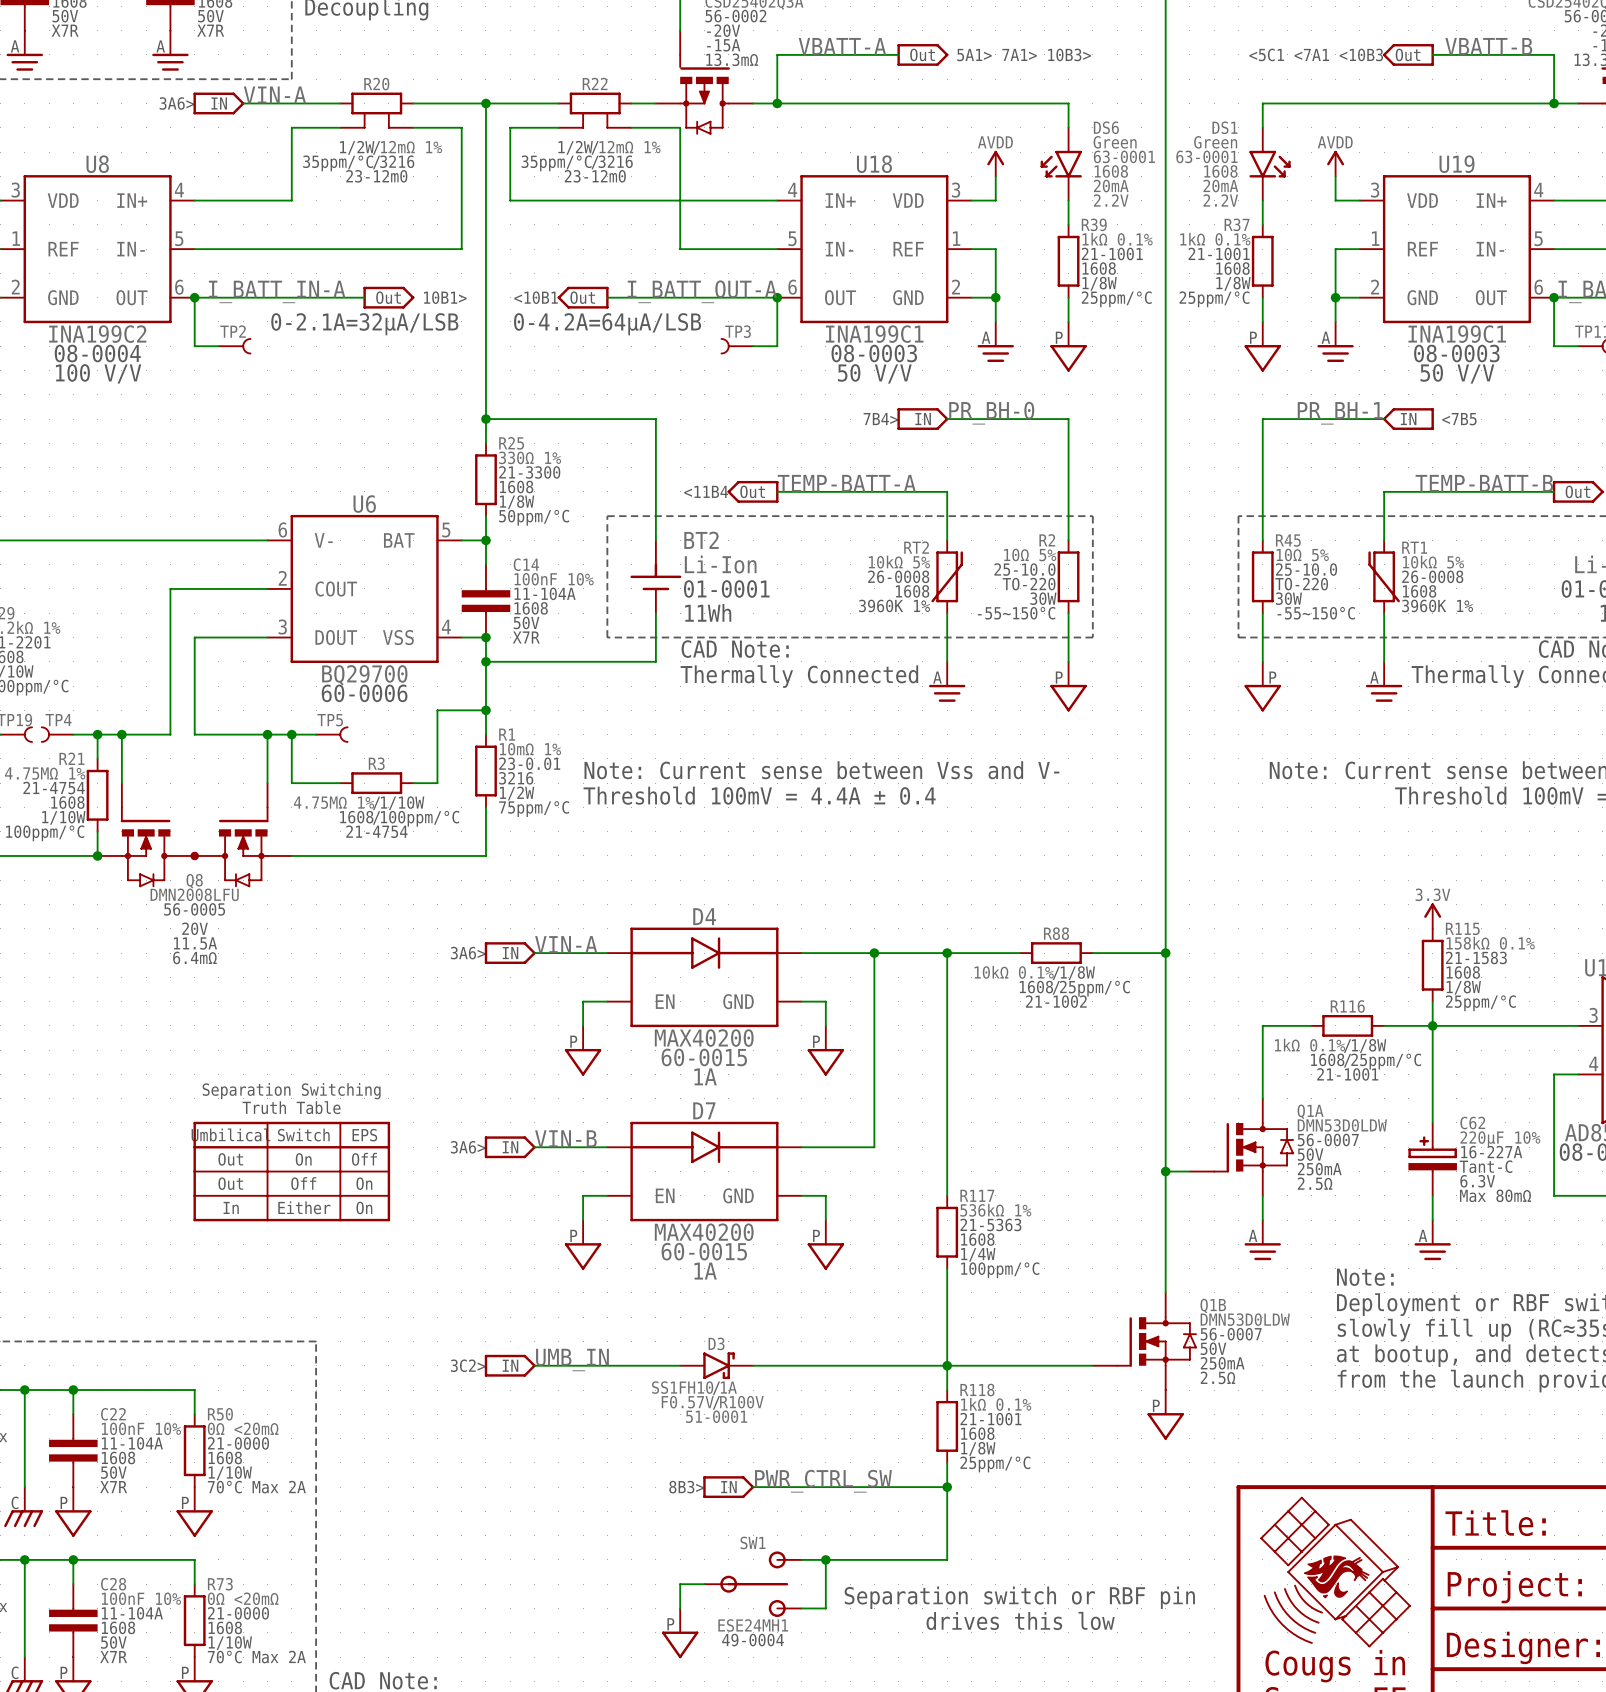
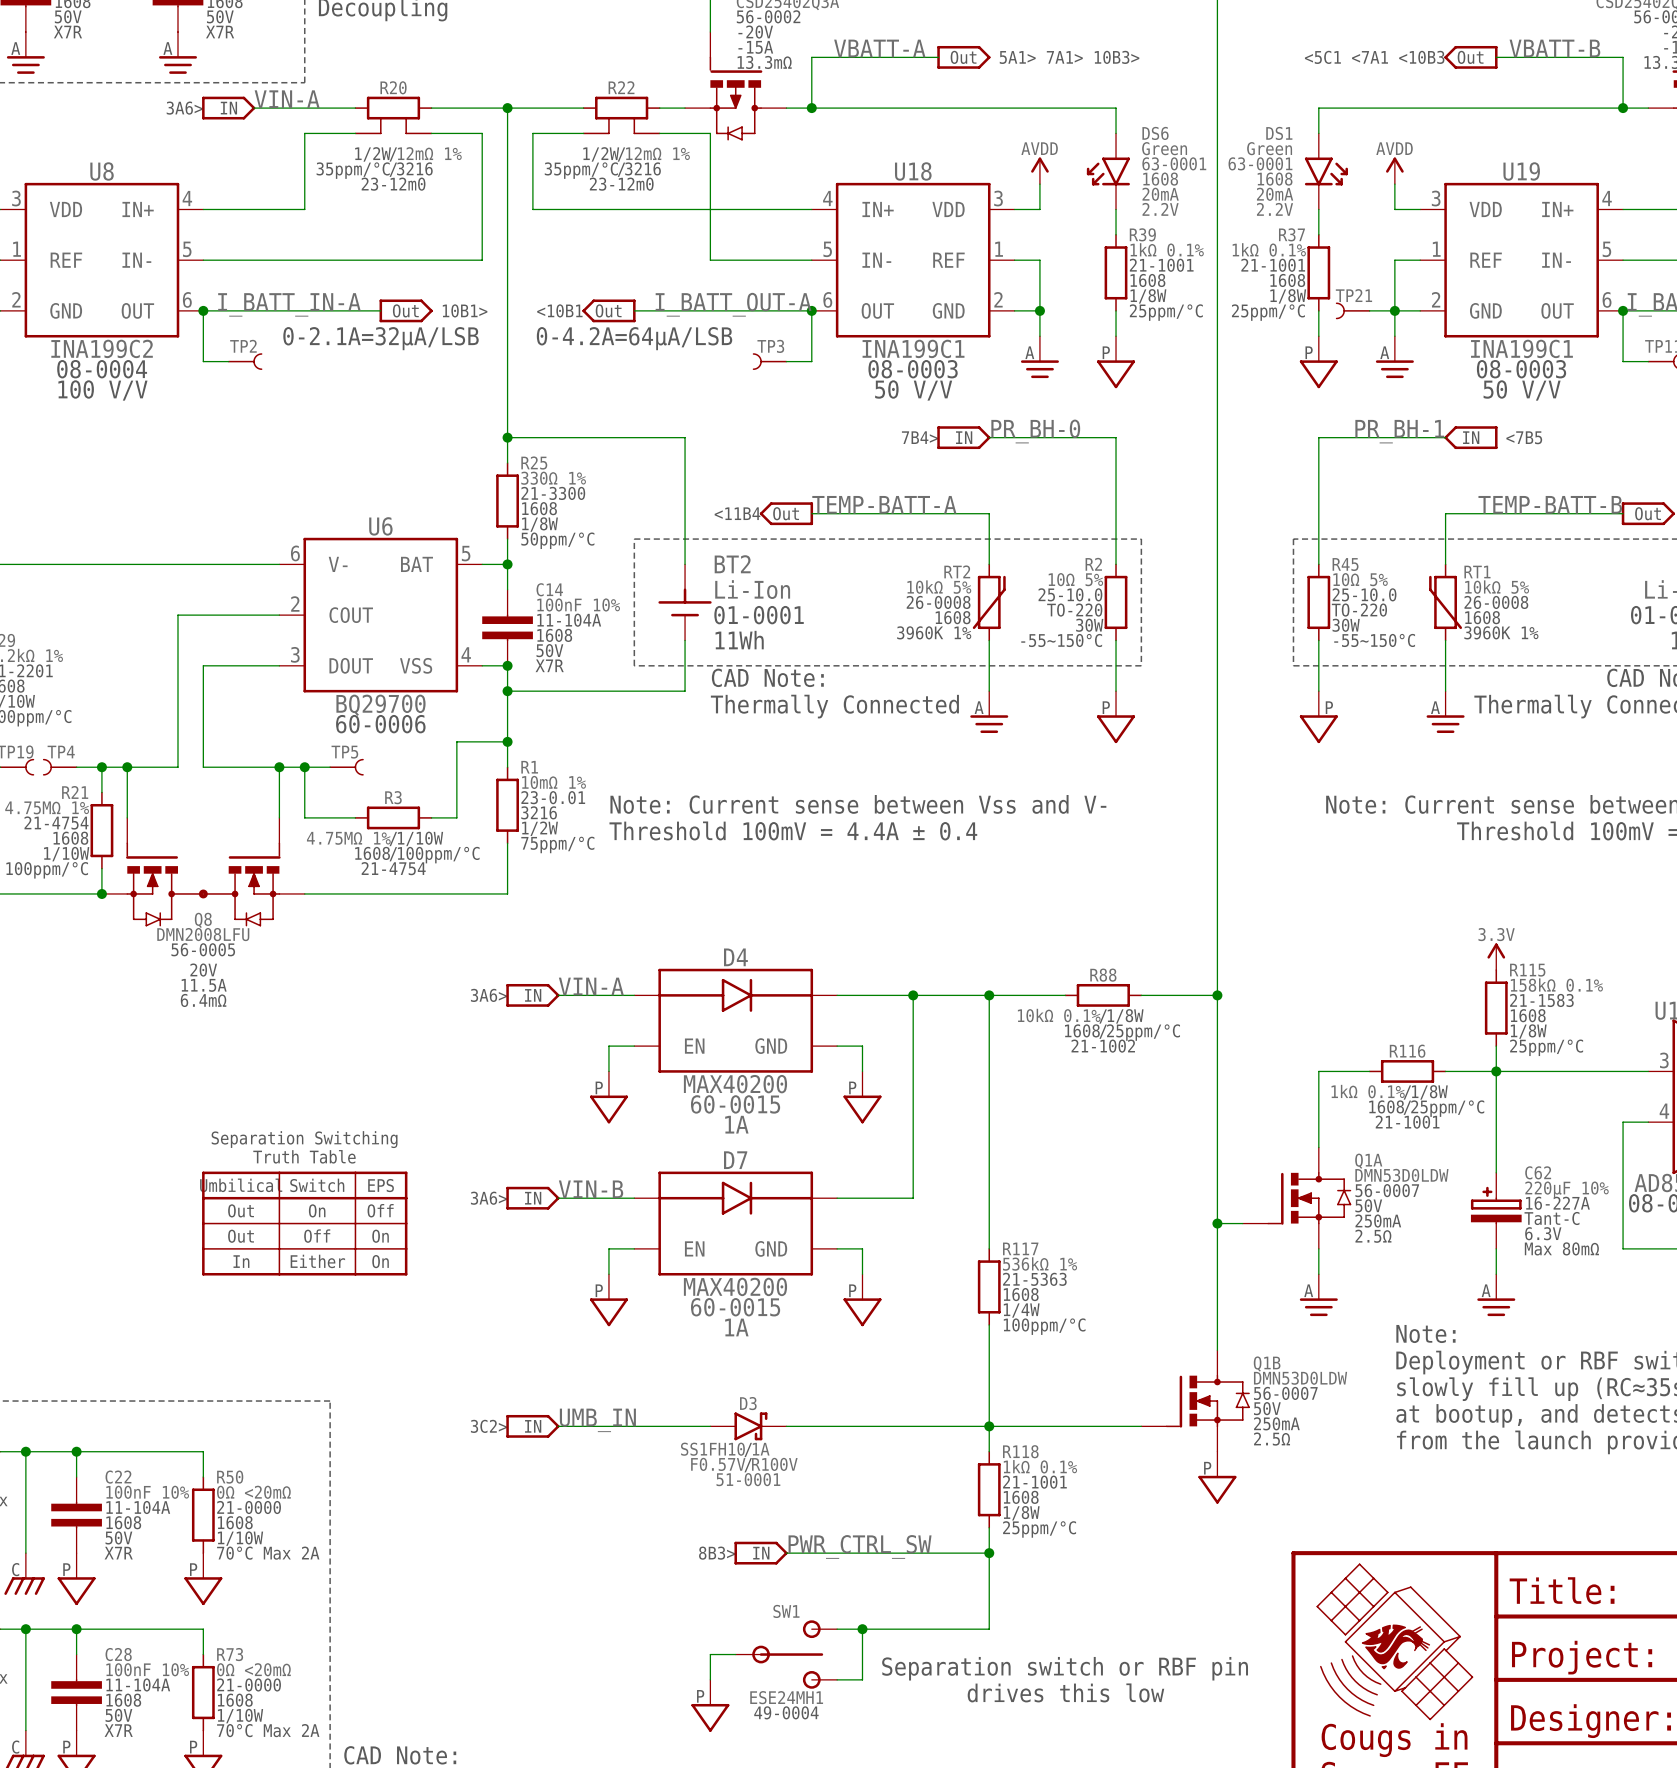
TP21: none -> (1353, 310)
wire: none -> (1369, 310) (1394, 310)

